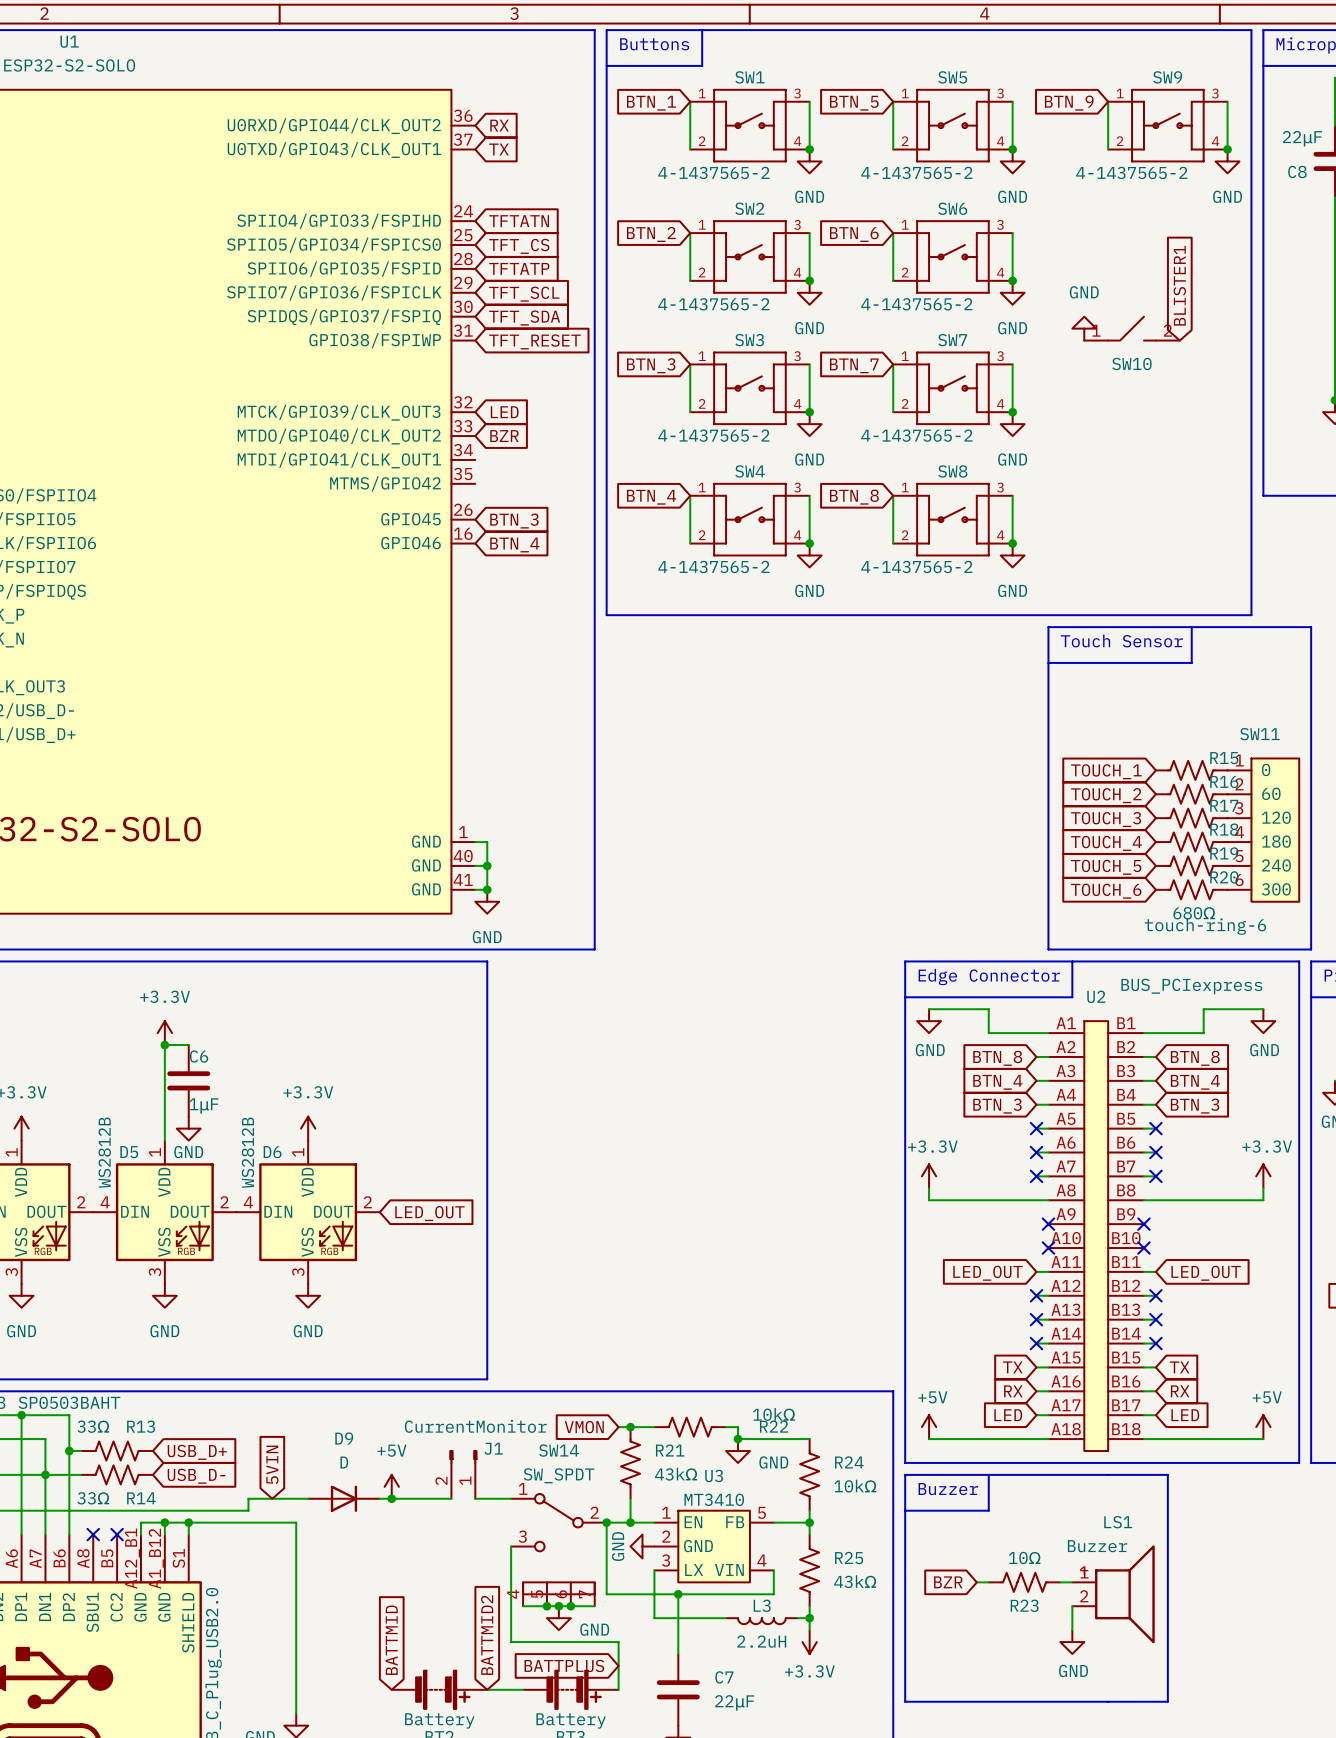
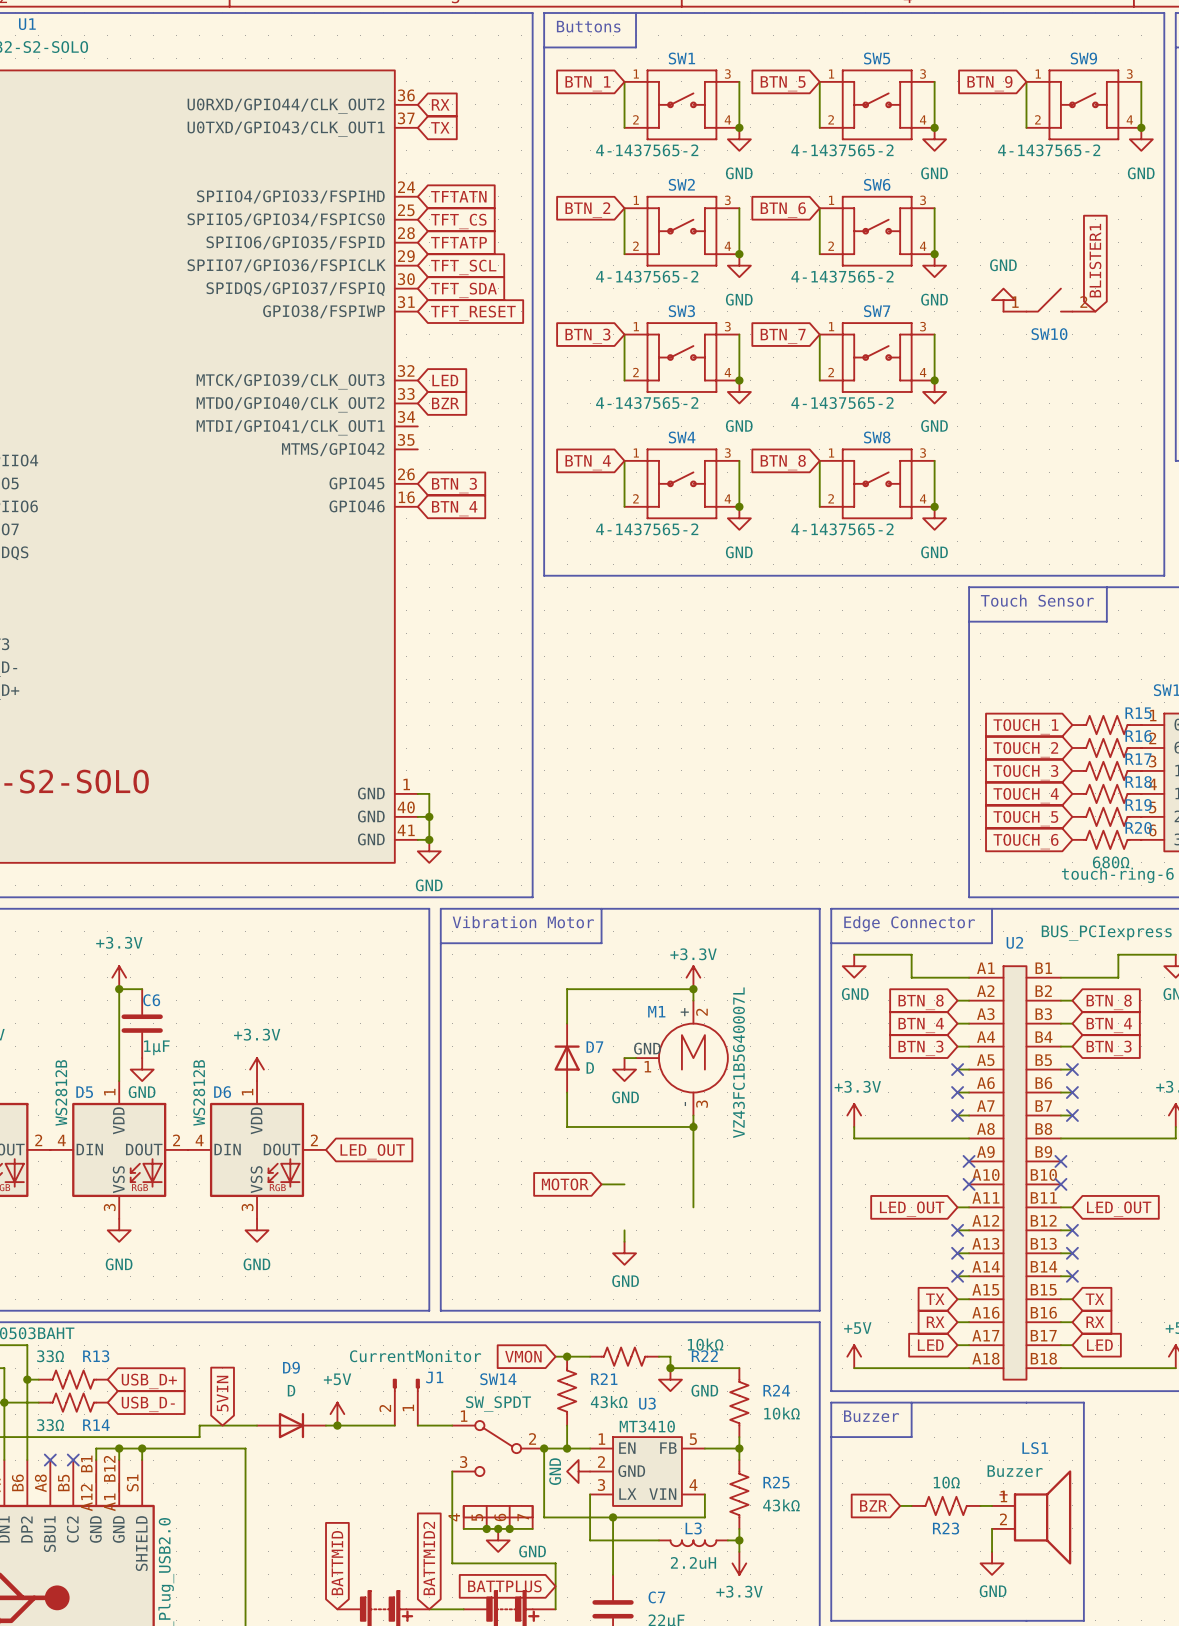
line: none -> (440, 908) (819, 908) (819, 1310) (440, 1310) (440, 908)
line: none -> (601, 908) (601, 943) (440, 943)
text: none -> Vibration Motor (523, 922)
power symbol: none -> +3.3V (693, 977)
junction: none -> (693, 989)
wire: none -> (693, 1000) (693, 989) (567, 989) (567, 1023)
D7: none -> D (567, 1058)
wire: none -> (624, 1058) (636, 1058)
M1: none -> VZ43FC1B5640007L (681, 1063)
power symbol: none -> GND (624, 1069)
wire: none -> (567, 1092) (567, 1126) (693, 1126)
wire: none -> (693, 1115) (693, 1207)
junction: none -> (693, 1126)
global label: none -> MOTOR (565, 1184)
wire: none -> (601, 1184) (624, 1184)
wire: none -> (624, 1230) (624, 1241)
power symbol: none -> GND (624, 1253)

